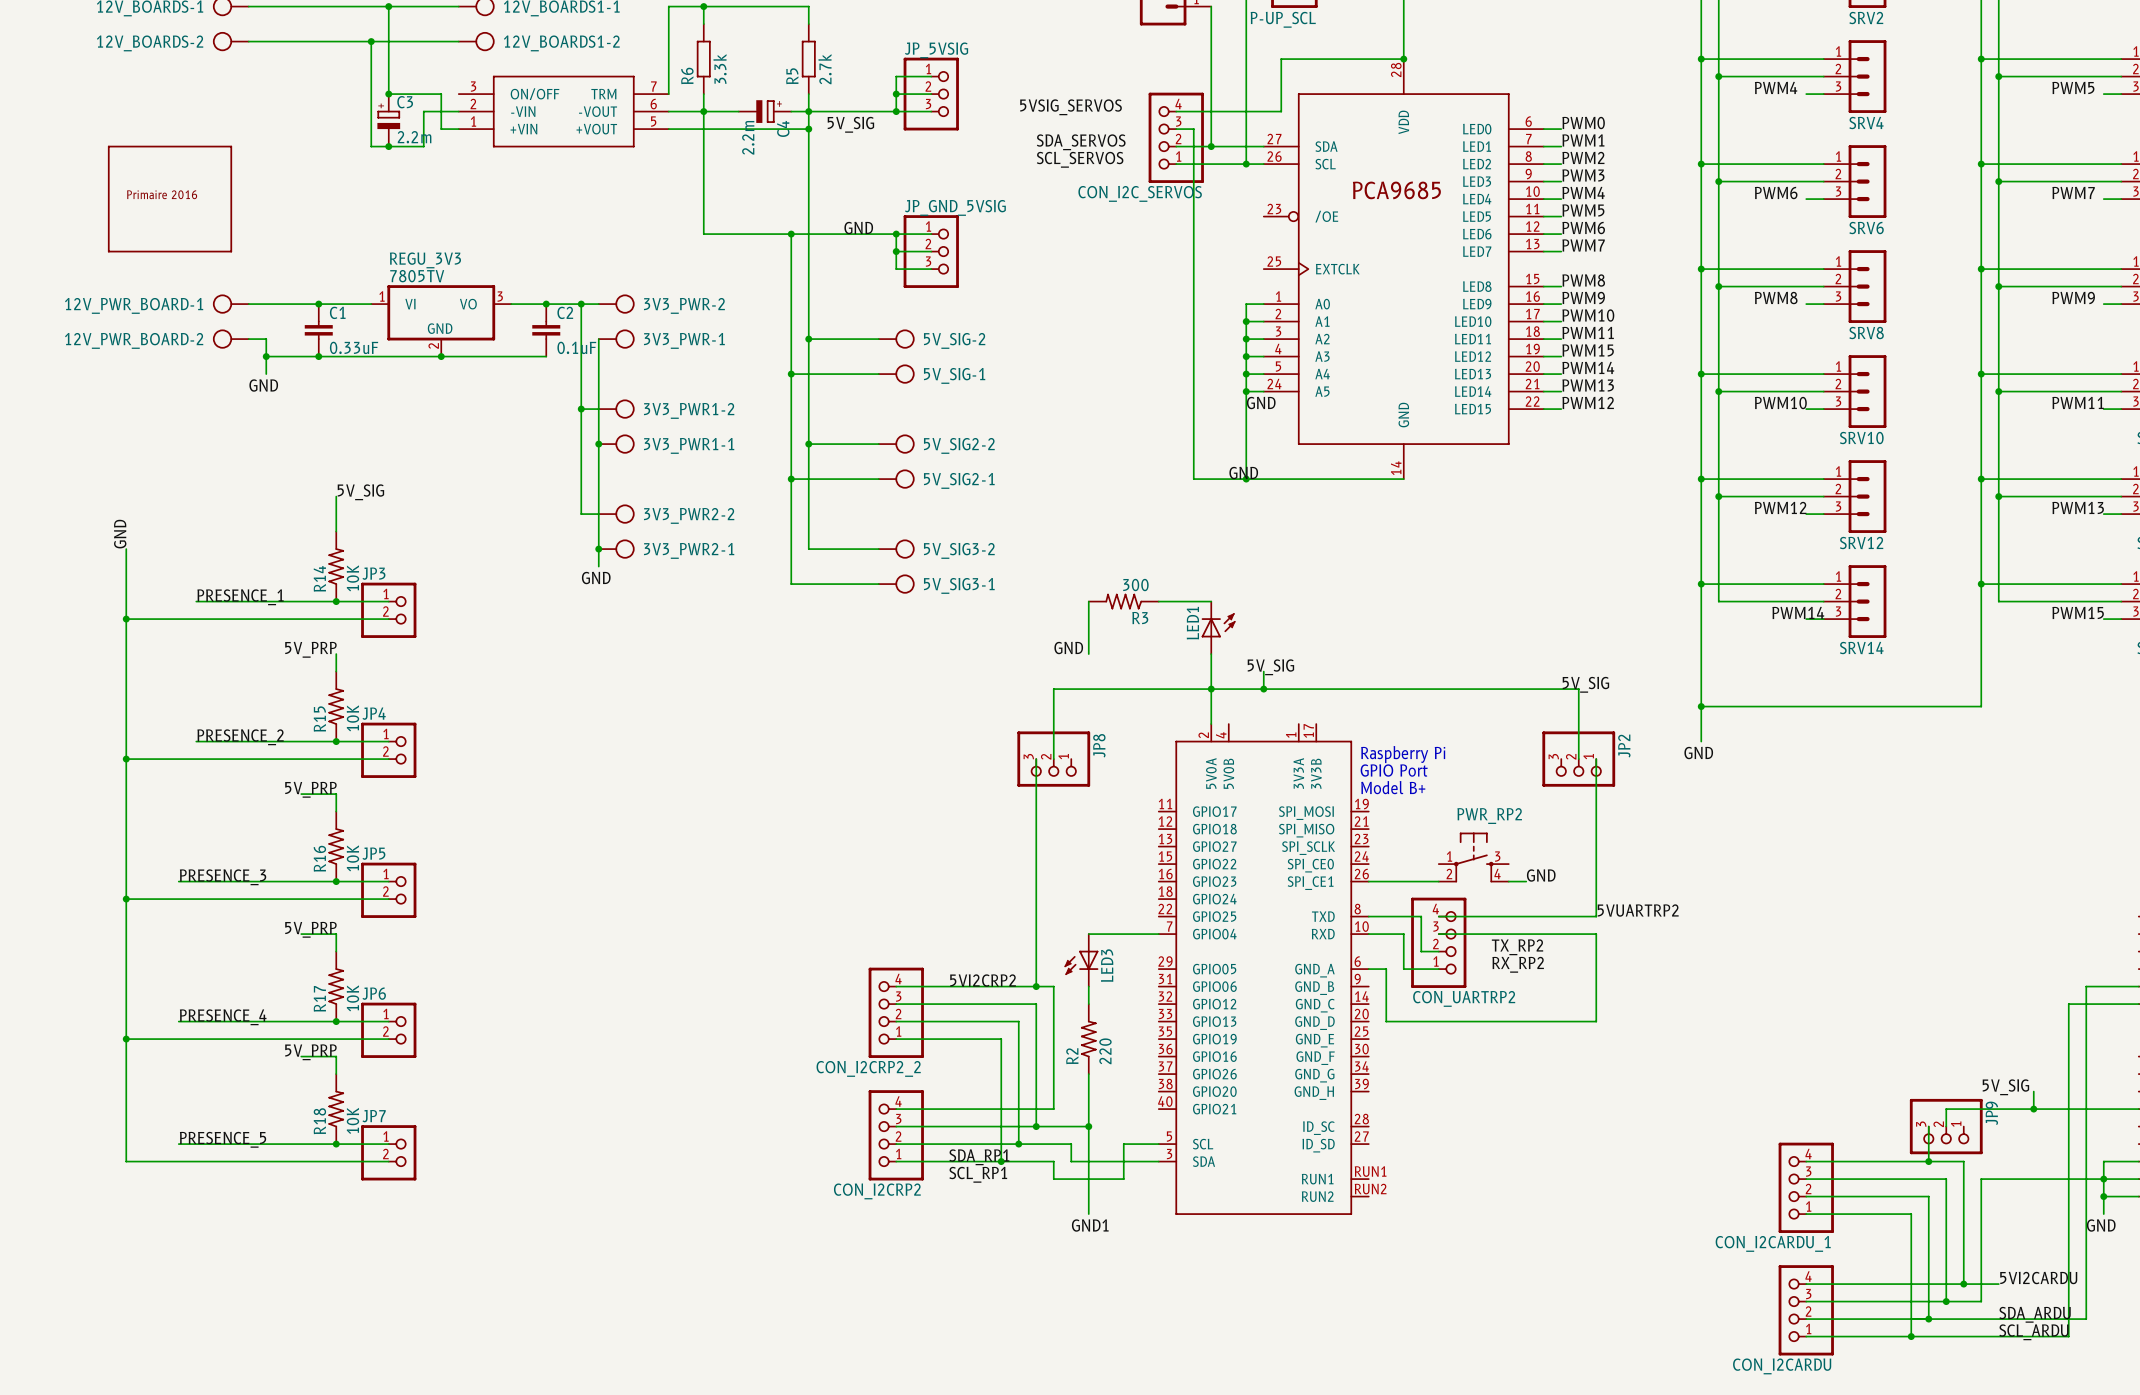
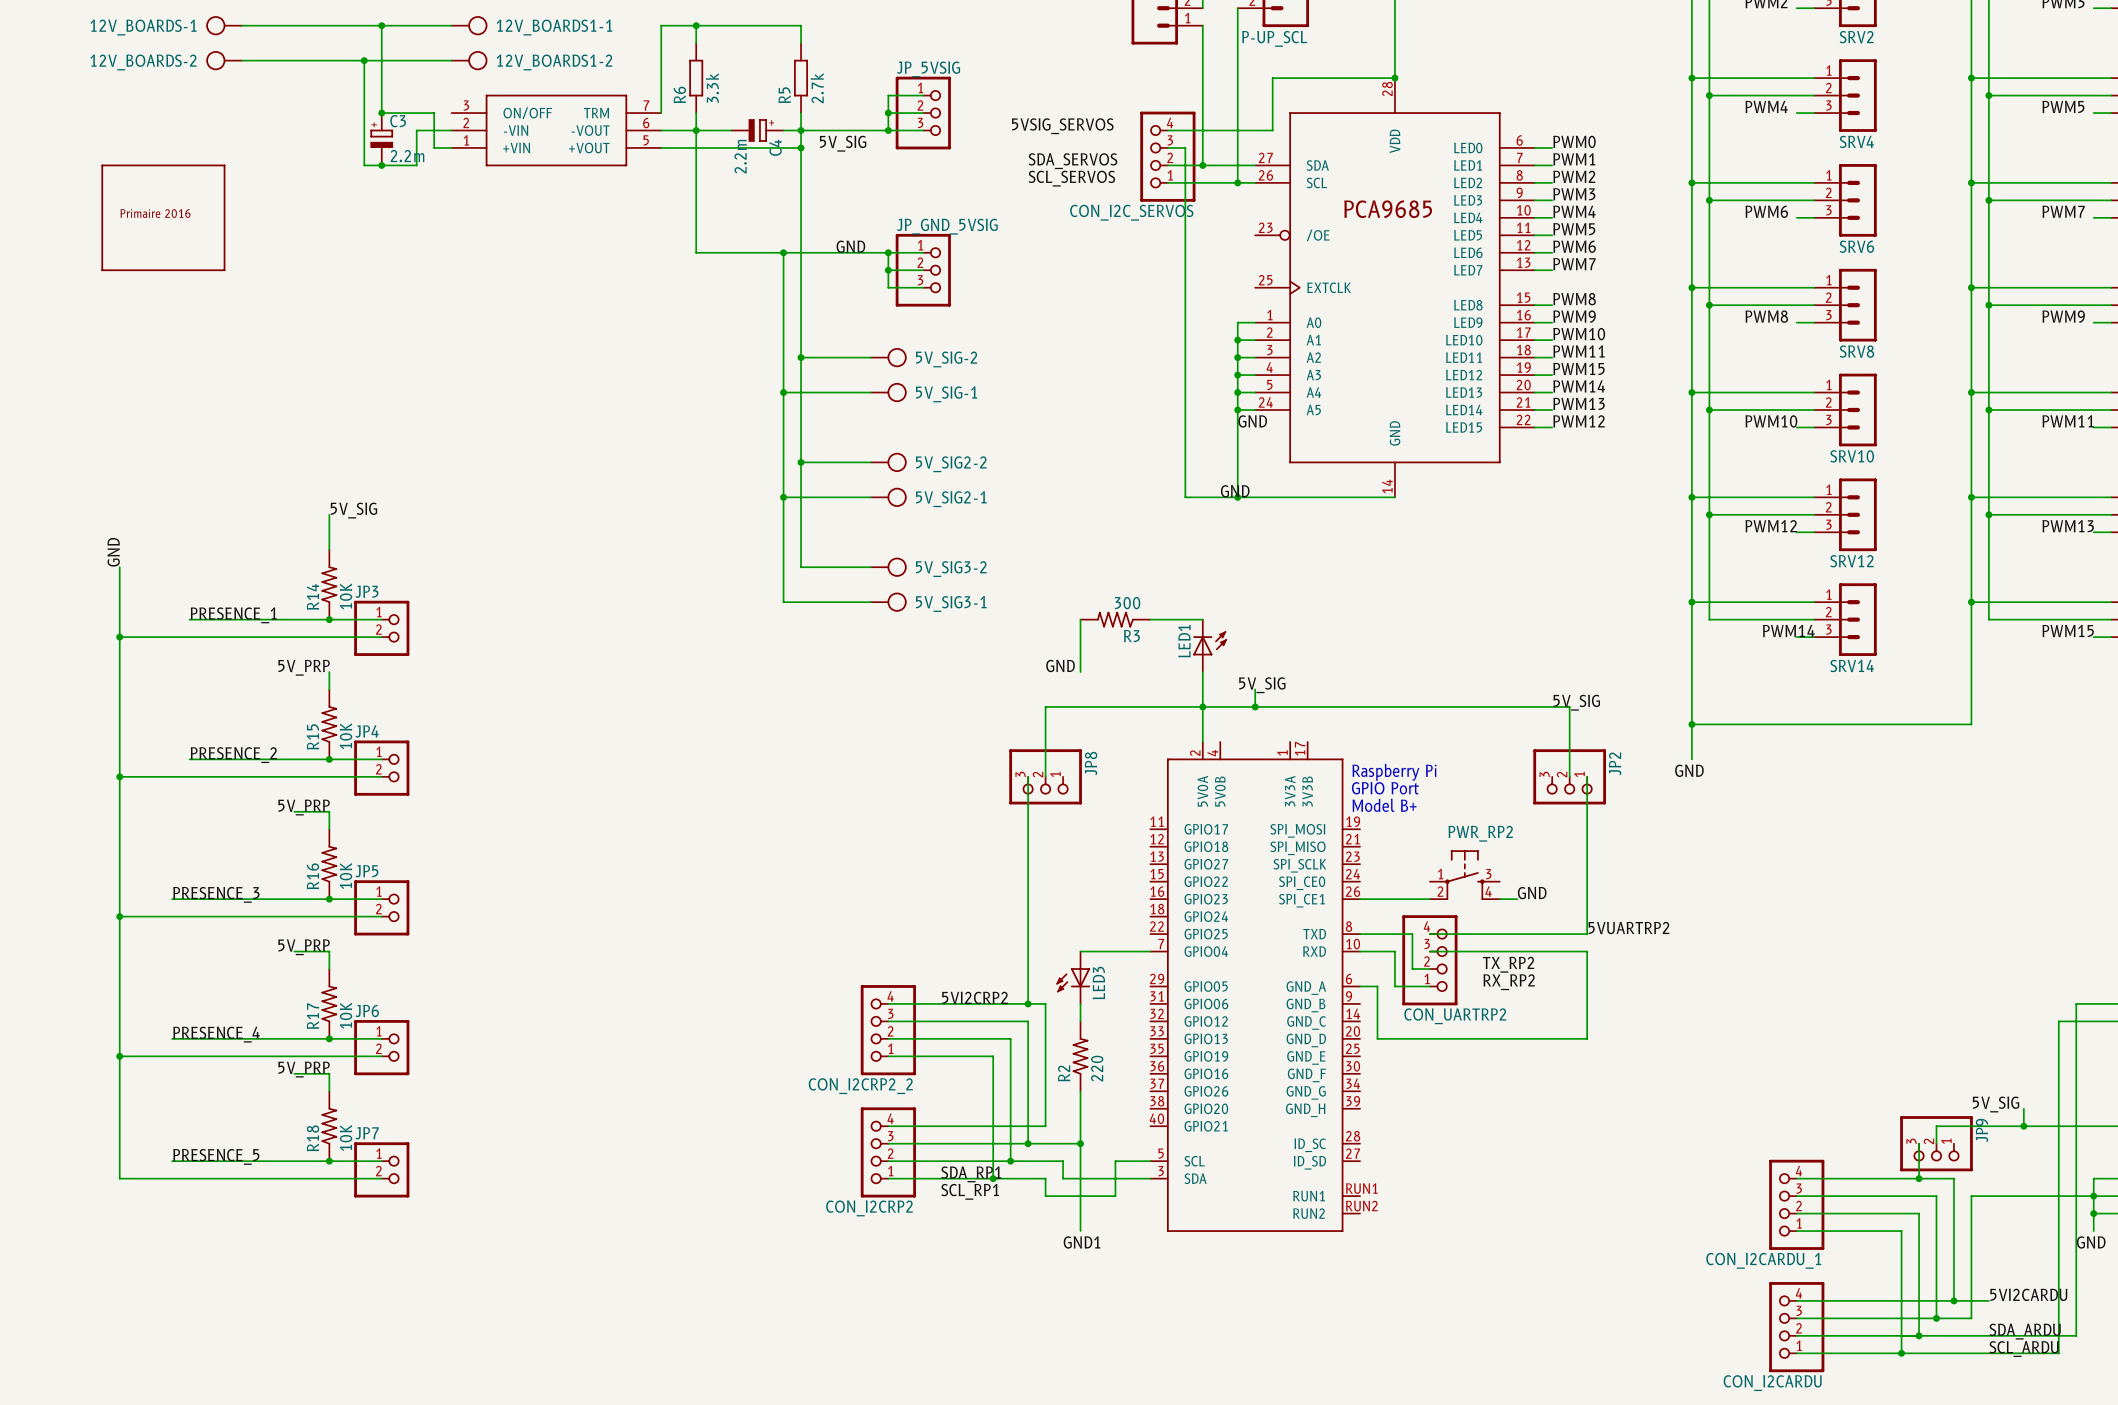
12V_PWR_BOARD-1: (230, 304) -> none
wire: (248, 304) (371, 304) -> none
junction: (318, 304) -> none
wire: (511, 304) (598, 304) -> none
junction: (546, 304) -> none
wire: (581, 304) (581, 514) (598, 514) -> none
junction: (581, 304) -> none
3V3_PWR-2: (616, 304) -> none
REGU_3V3: 7805TV (441, 320) -> none
C1: 0.33uF (318, 330) -> none
C2: 0.1uF (546, 330) -> none
12V_PWR_BOARD-2: (230, 339) -> none
wire: (248, 339) (266, 339) (266, 374) -> none
wire: (598, 339) (598, 566) -> none
3V3_PWR-1: (616, 339) -> none
wire: (266, 356) (546, 356) -> none
junction: (266, 356) -> none
junction: (318, 356) -> none
junction: (441, 356) -> none
label: GND (263, 385) -> none
wire: (581, 409) (598, 409) -> none
junction: (581, 409) -> none
3V3_PWR1-2: (616, 409) -> none
junction: (598, 444) -> none
3V3_PWR1-1: (616, 444) -> none
3V3_PWR2-2: (616, 514) -> none
junction: (598, 549) -> none
3V3_PWR2-1: (616, 549) -> none
label: GND (596, 578) -> none

